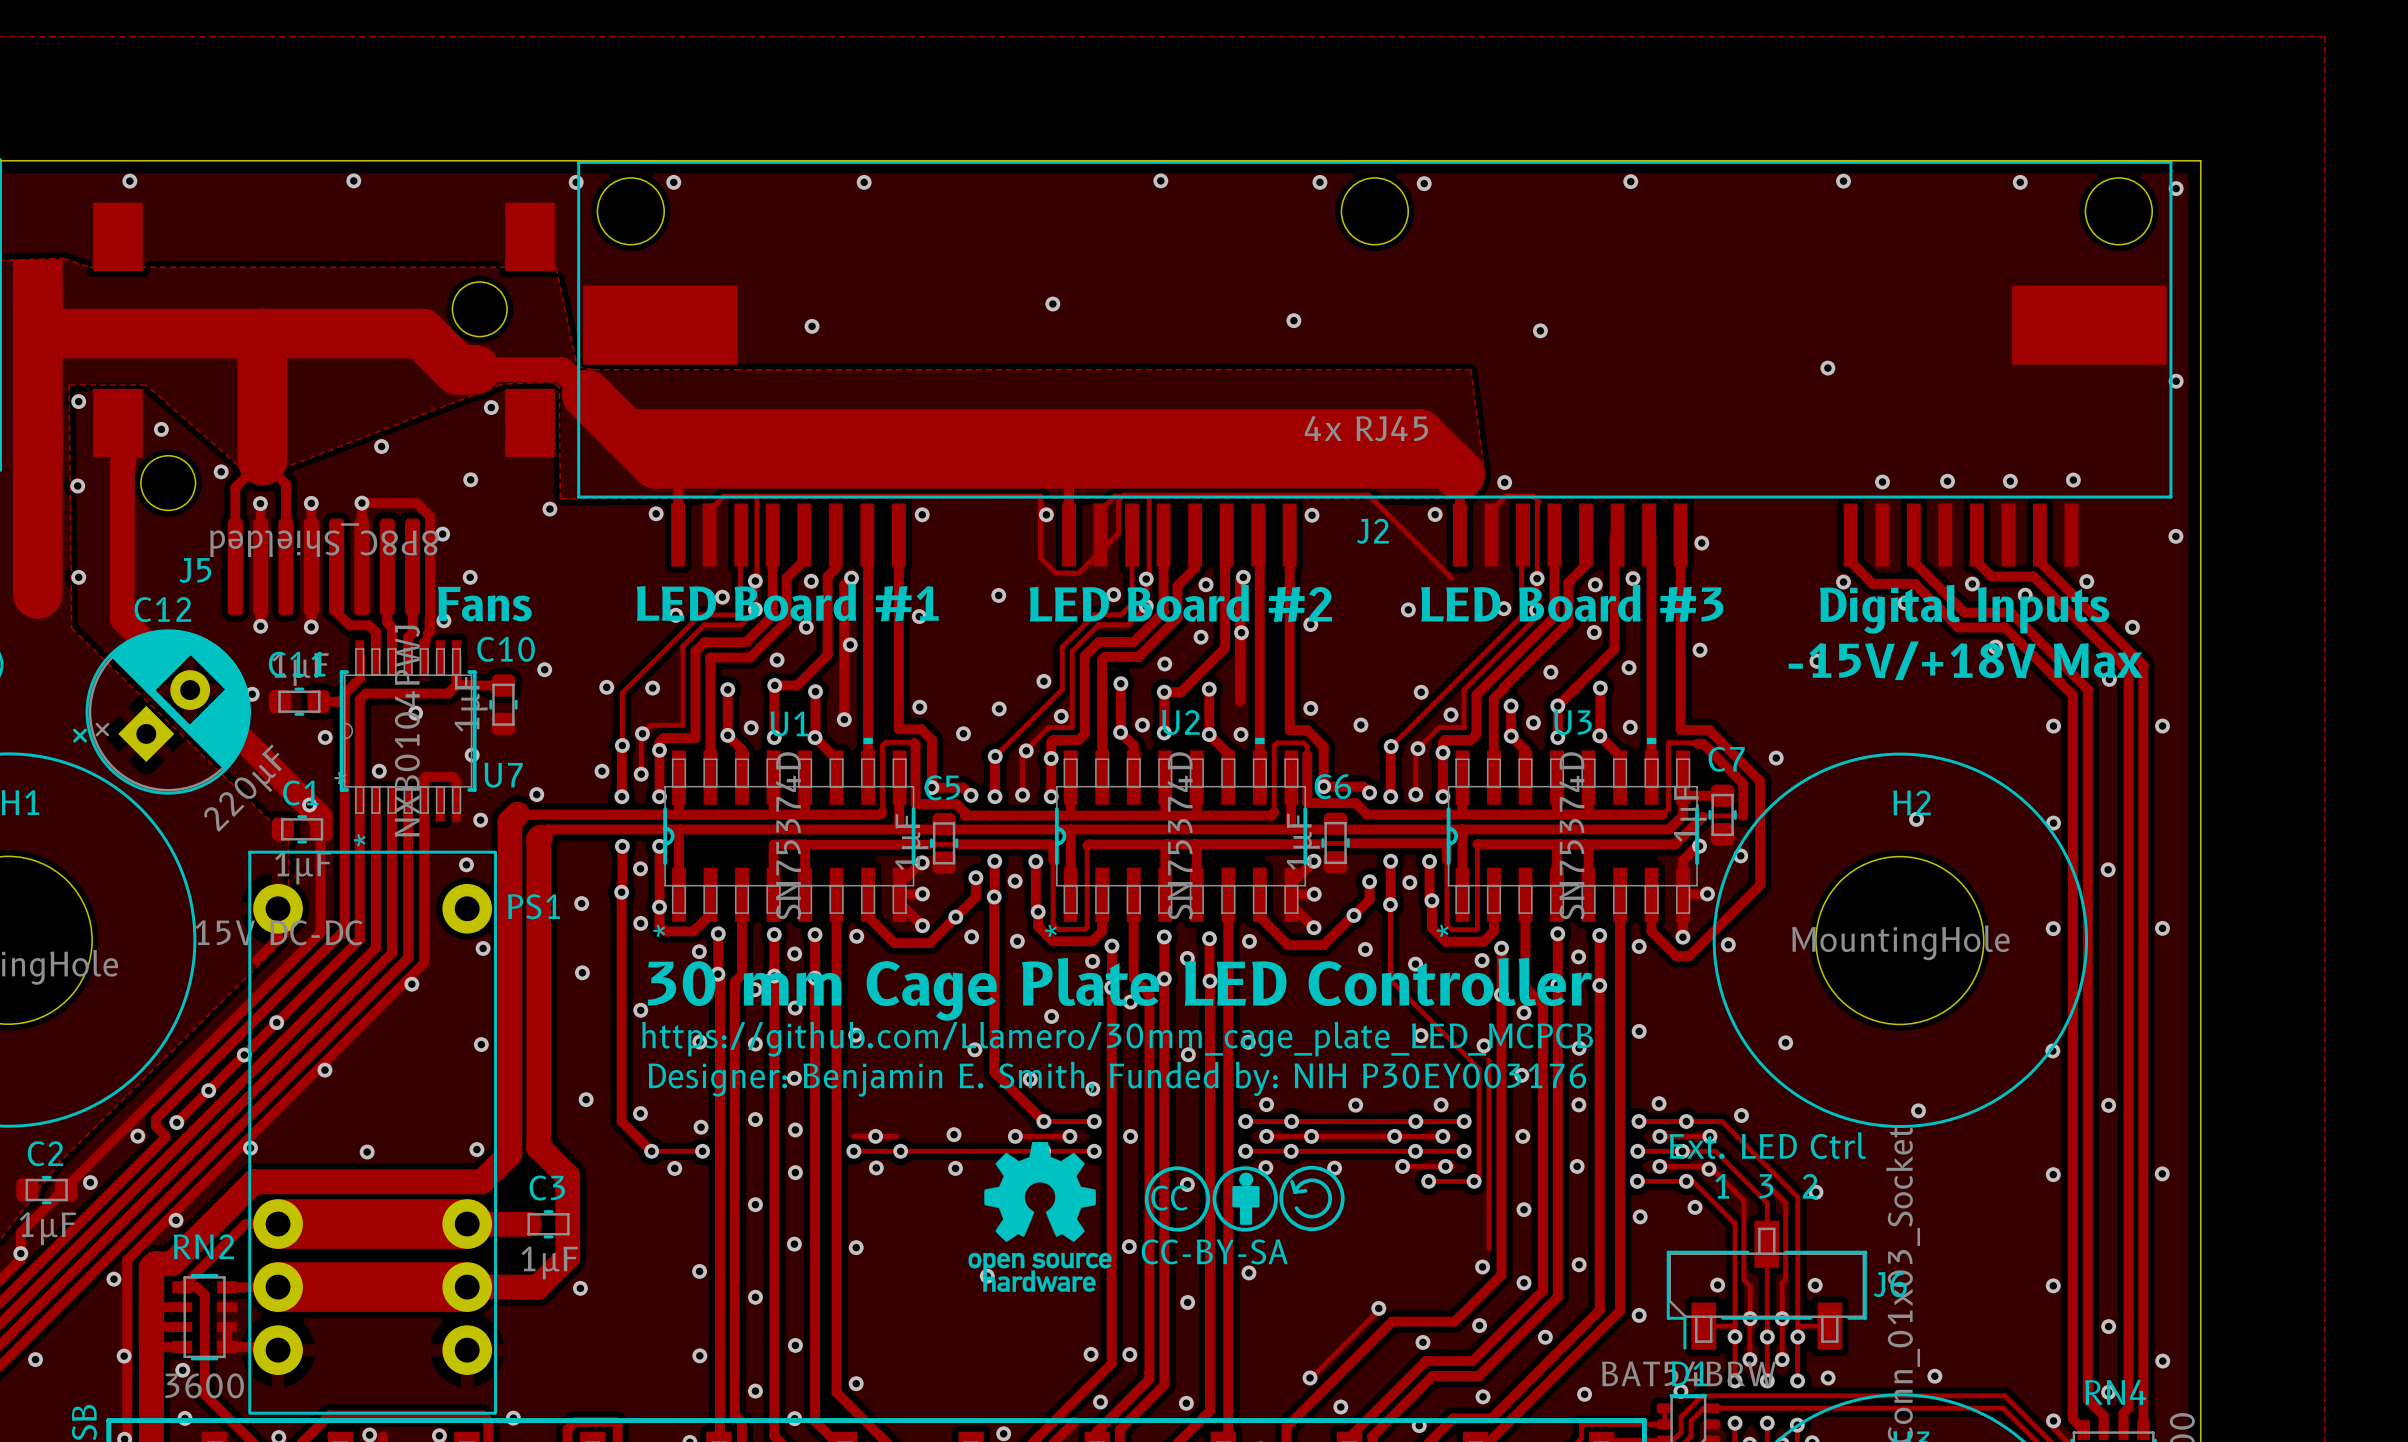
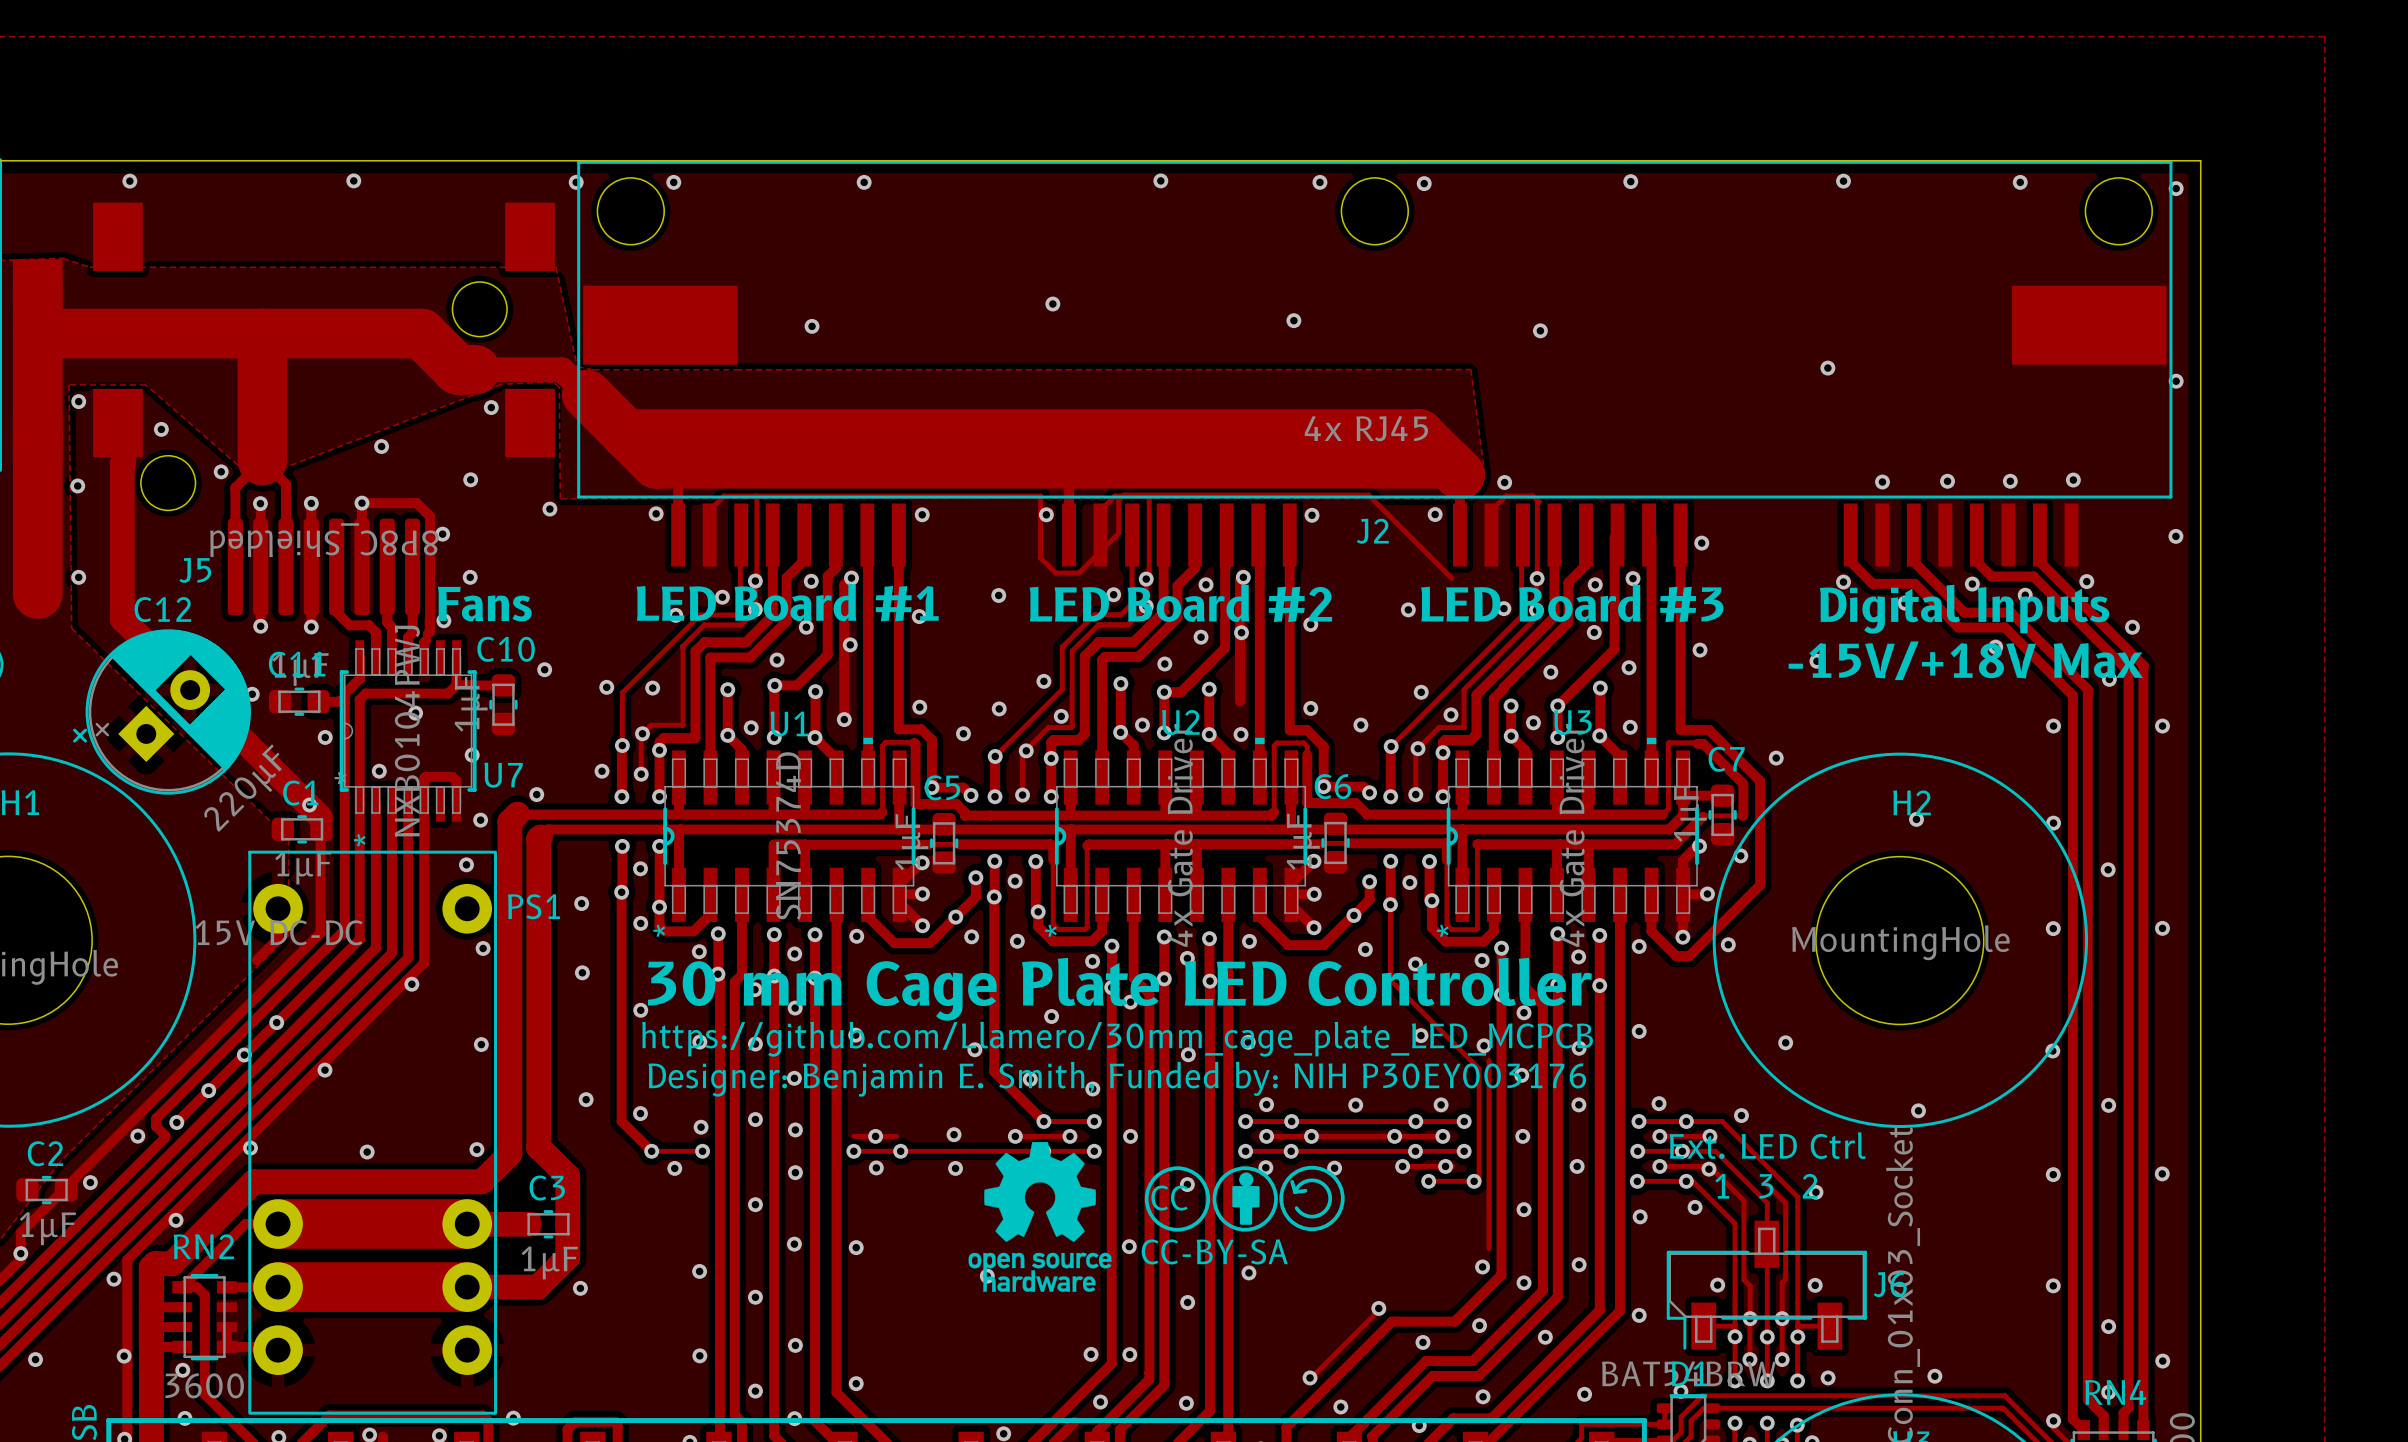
U2 value: SN75374D (1180, 836) -> 4x Gate Driver (1180, 835)
U3 value: SN75374D (1572, 836) -> 4x Gate Driver (1572, 835)

